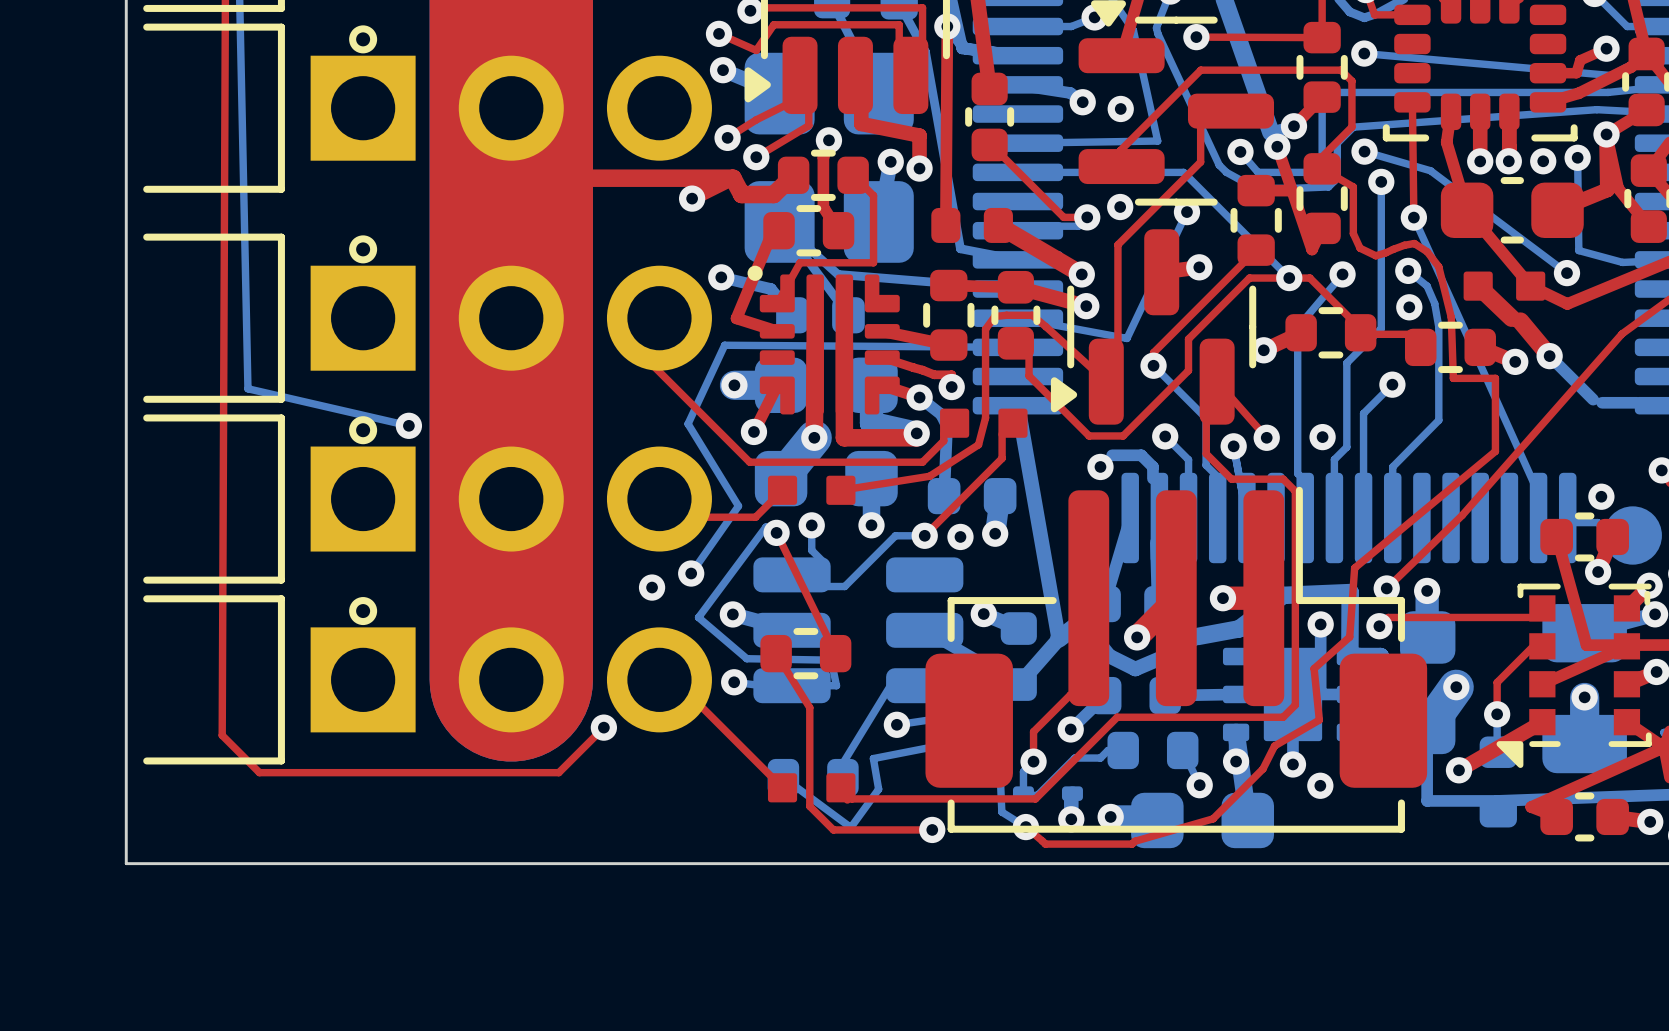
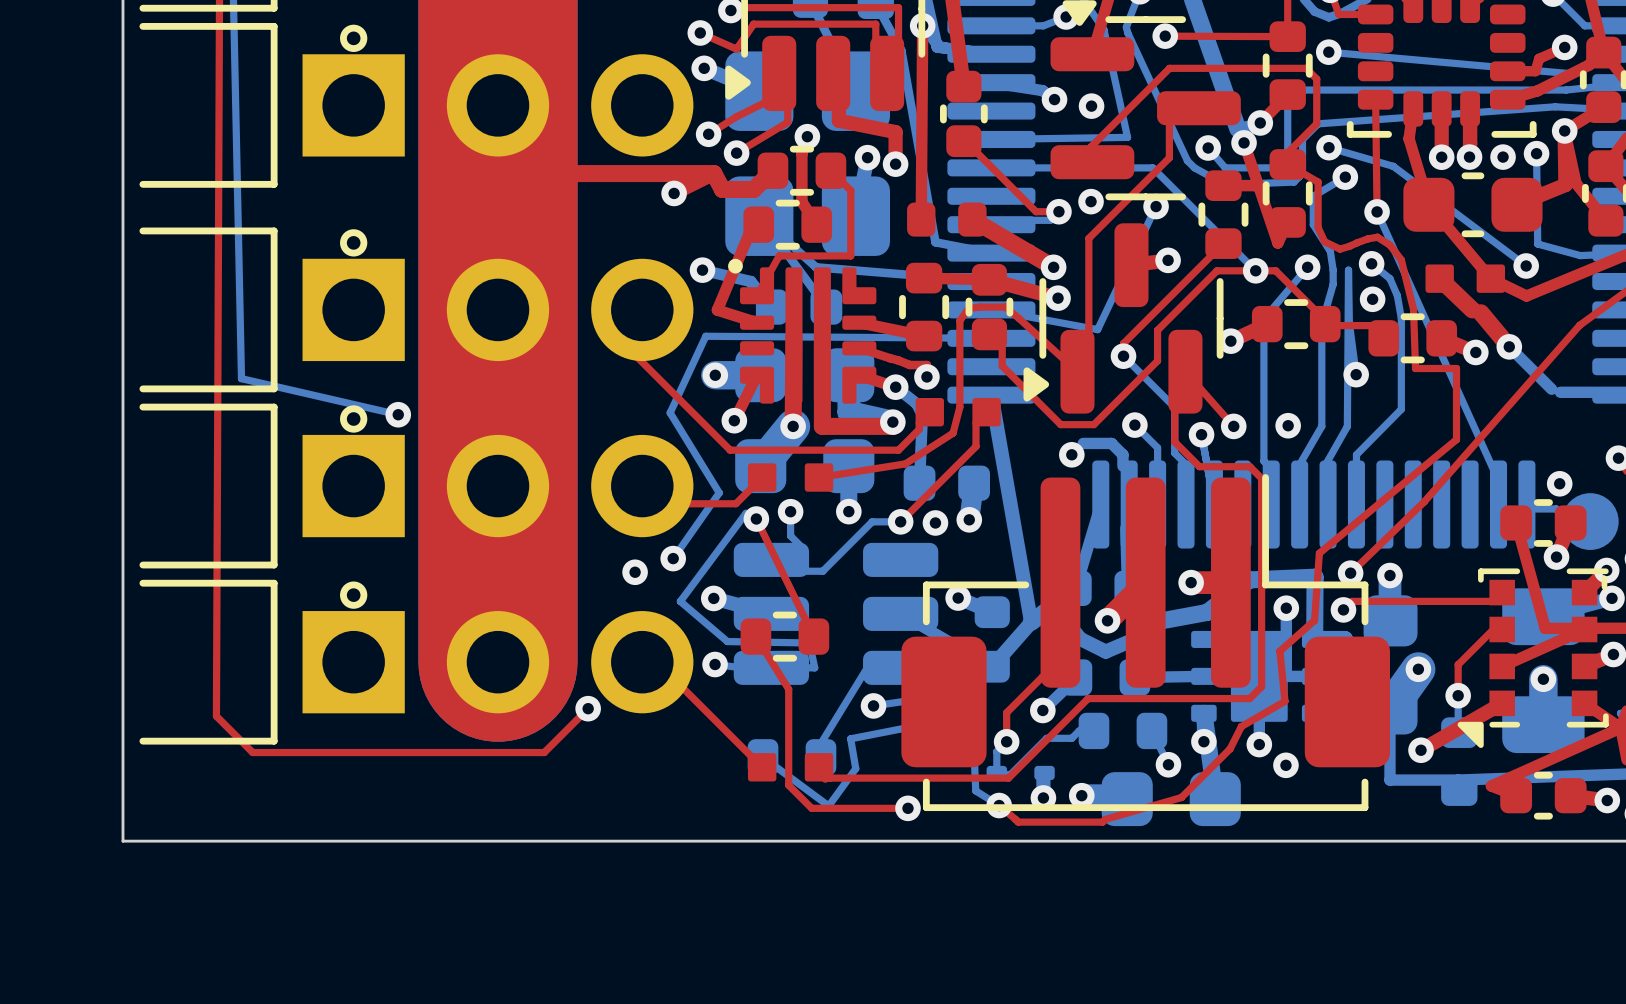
bottom track: (1381, 181) (1381, 328) (1346, 363) (1346, 447) (1334, 459) (1334, 518) -> (1345, 177) (1313, 196) (1313, 224) (1330, 251) (1333, 284) (1321, 324) (1321, 426) (1299, 464)
bottom track: (1392, 384) (1363, 413) (1363, 472) -> (1356, 374) (1349, 323) (1348, 270) (1347, 426) (1328, 460)

